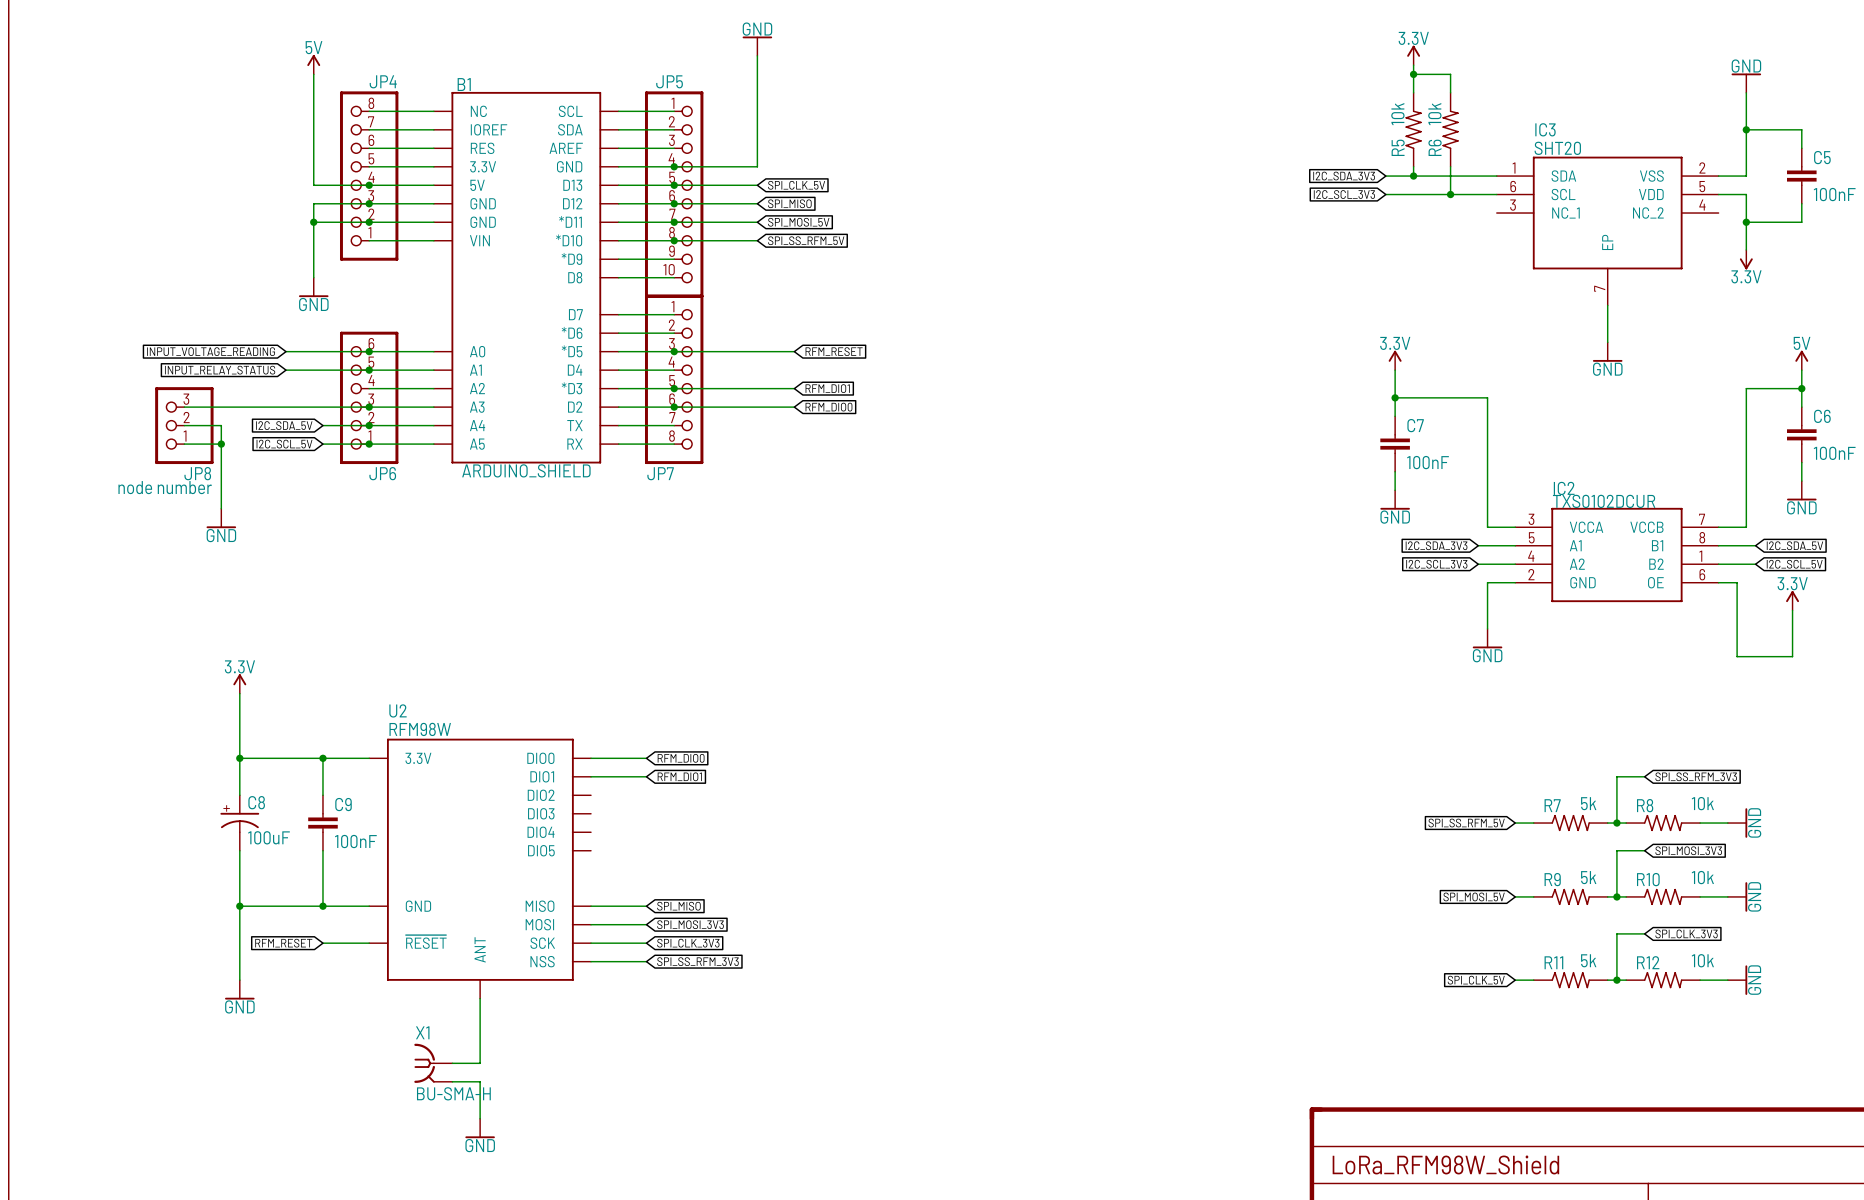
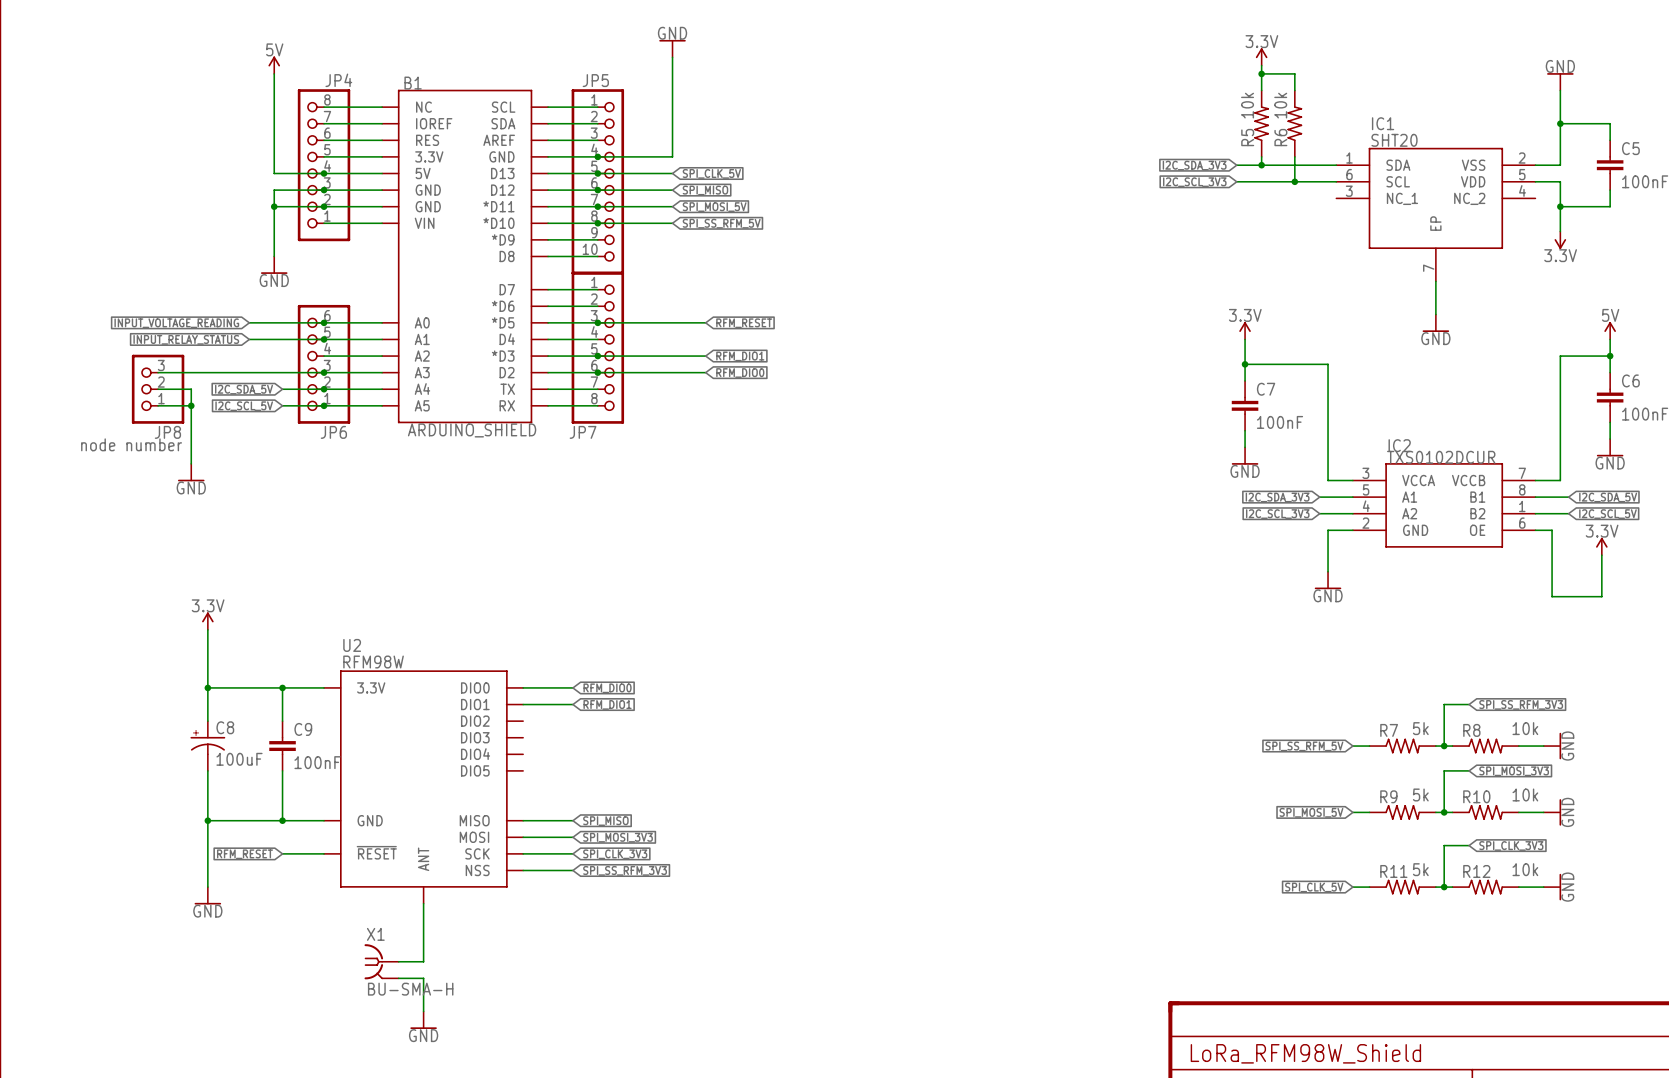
IC3 name: IC3 (1545, 129) -> IC1 (1383, 123)

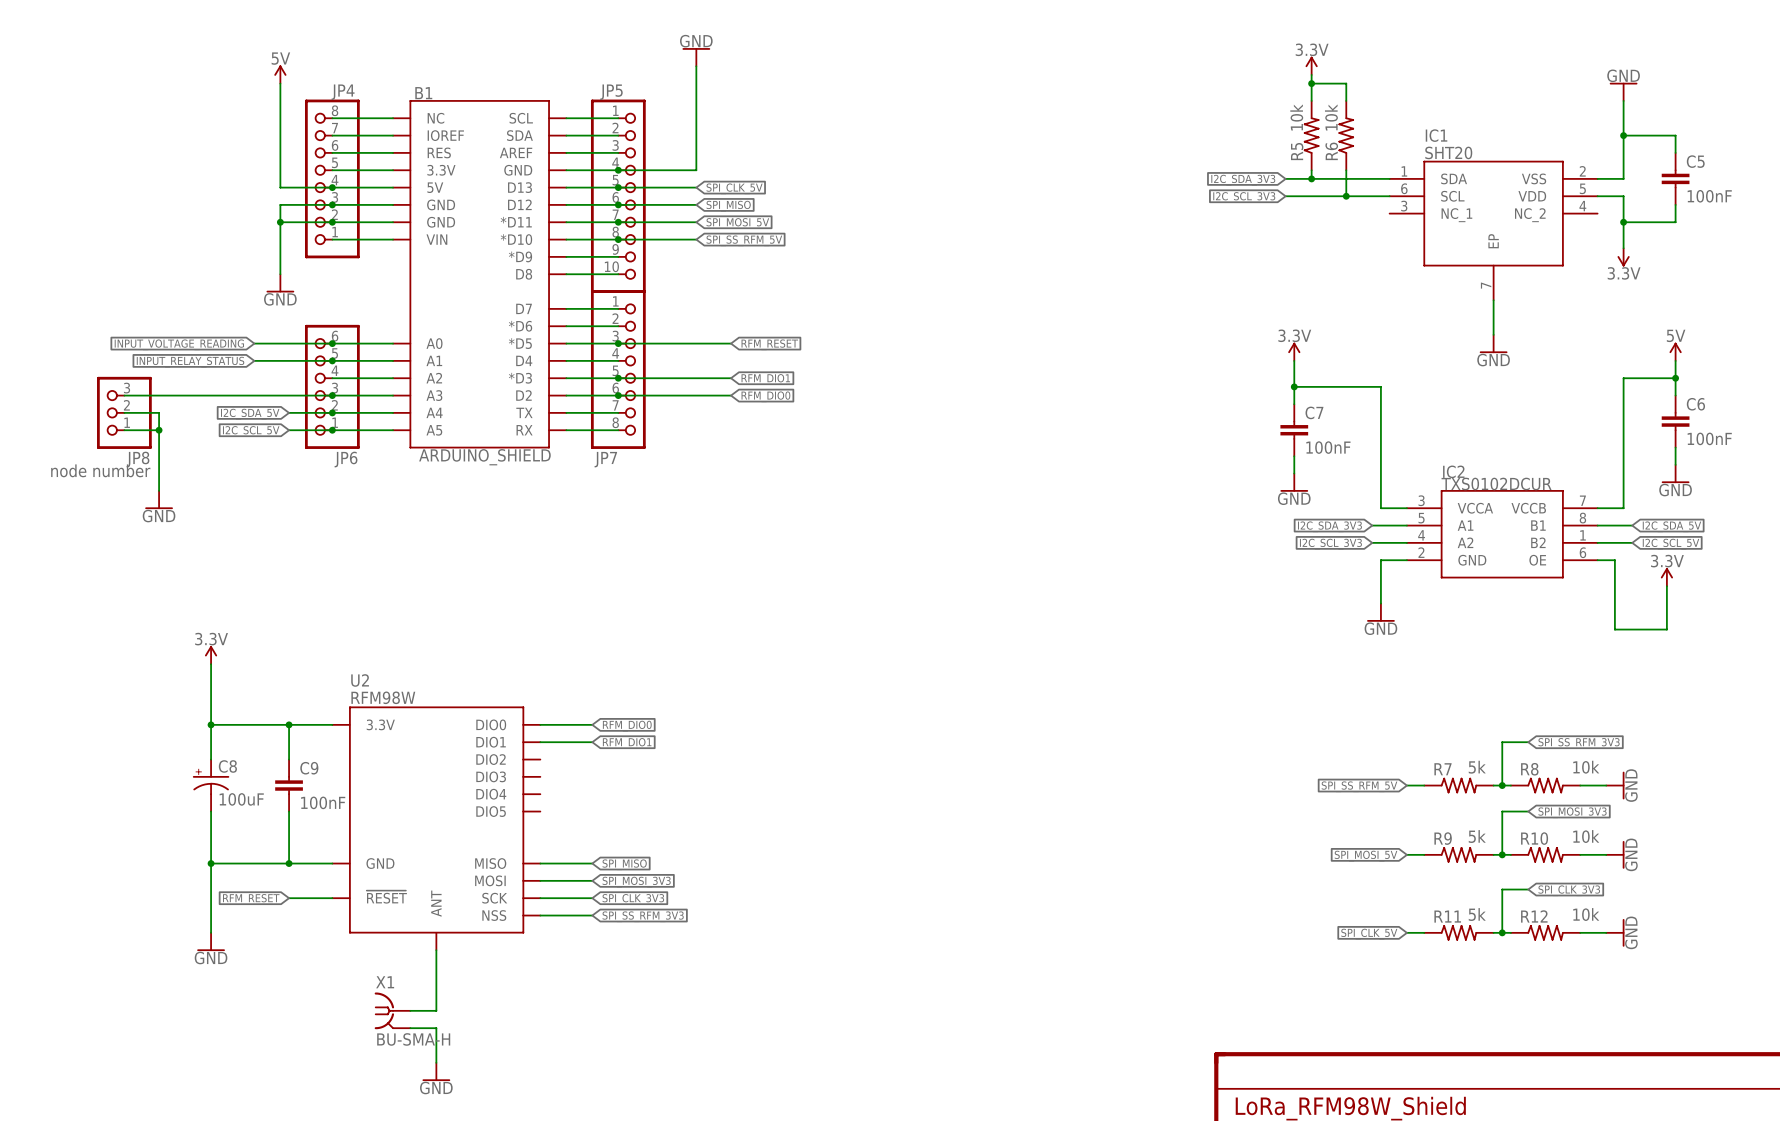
wire: none -> (124, 395) (159, 395)
wire: (158, 389) (191, 389) (191, 463) -> (124, 412) (159, 412) (159, 490)
JP8 position: (158, 389) -> (124, 412)
wire: (158, 405) (191, 405) -> (159, 430) (124, 430)
junction position: (191, 405) -> (159, 430)
power symbol position: GND (191, 472) -> GND (159, 500)

